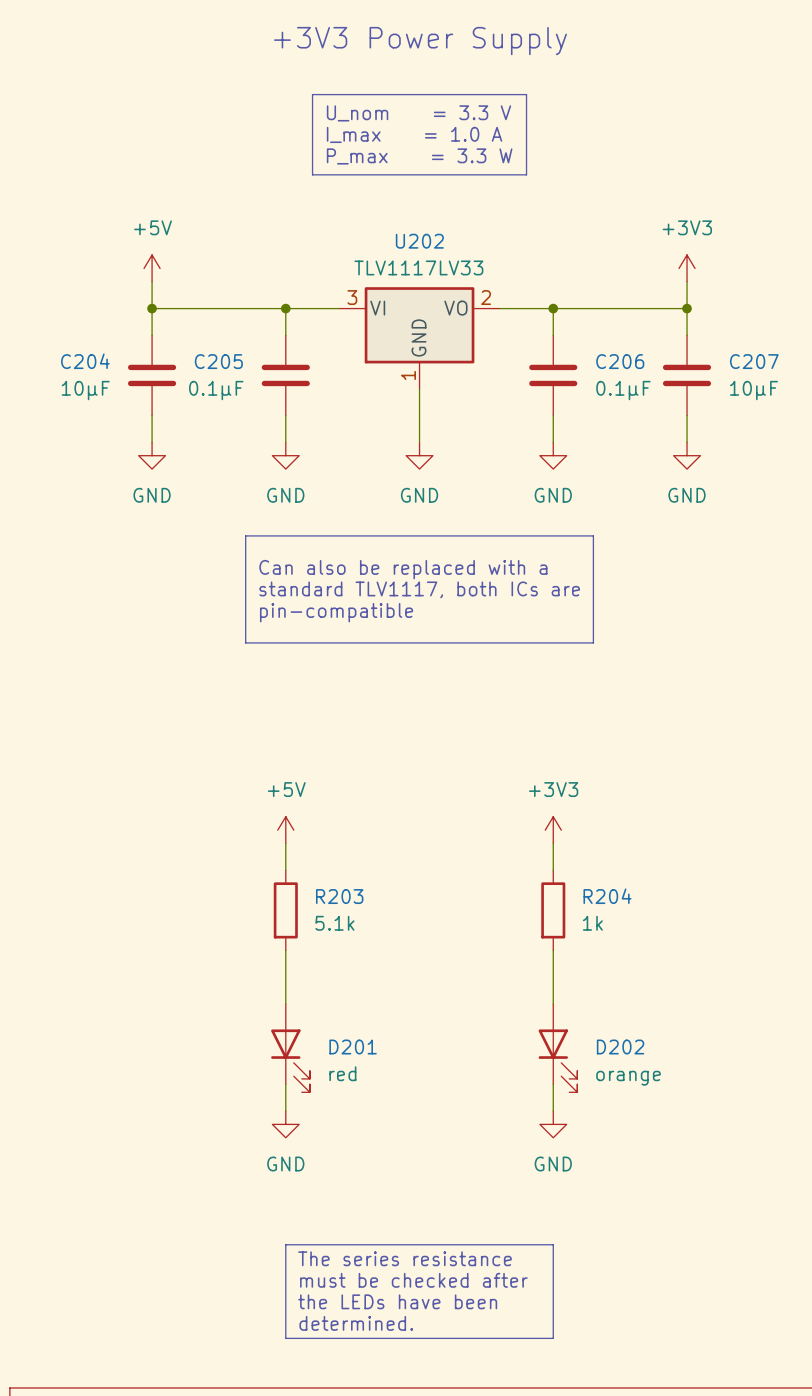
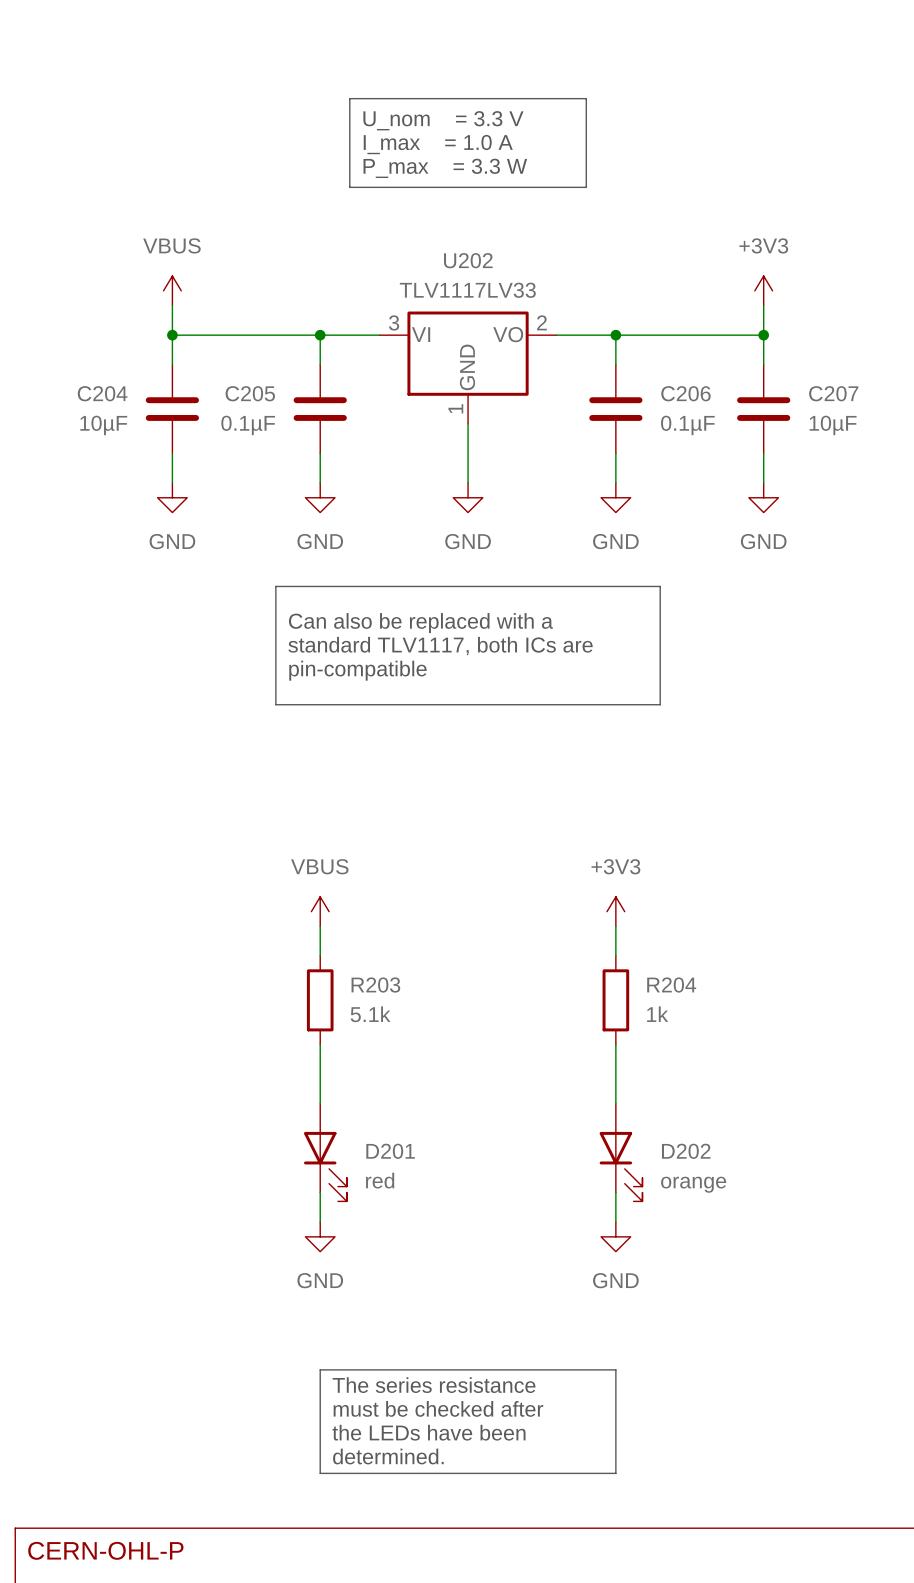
text: +3V3 Power Supply (420, 41) -> none
power symbol: +5V (152, 268) -> VBUS (172, 290)
power symbol: +5V (285, 830) -> VBUS (320, 911)

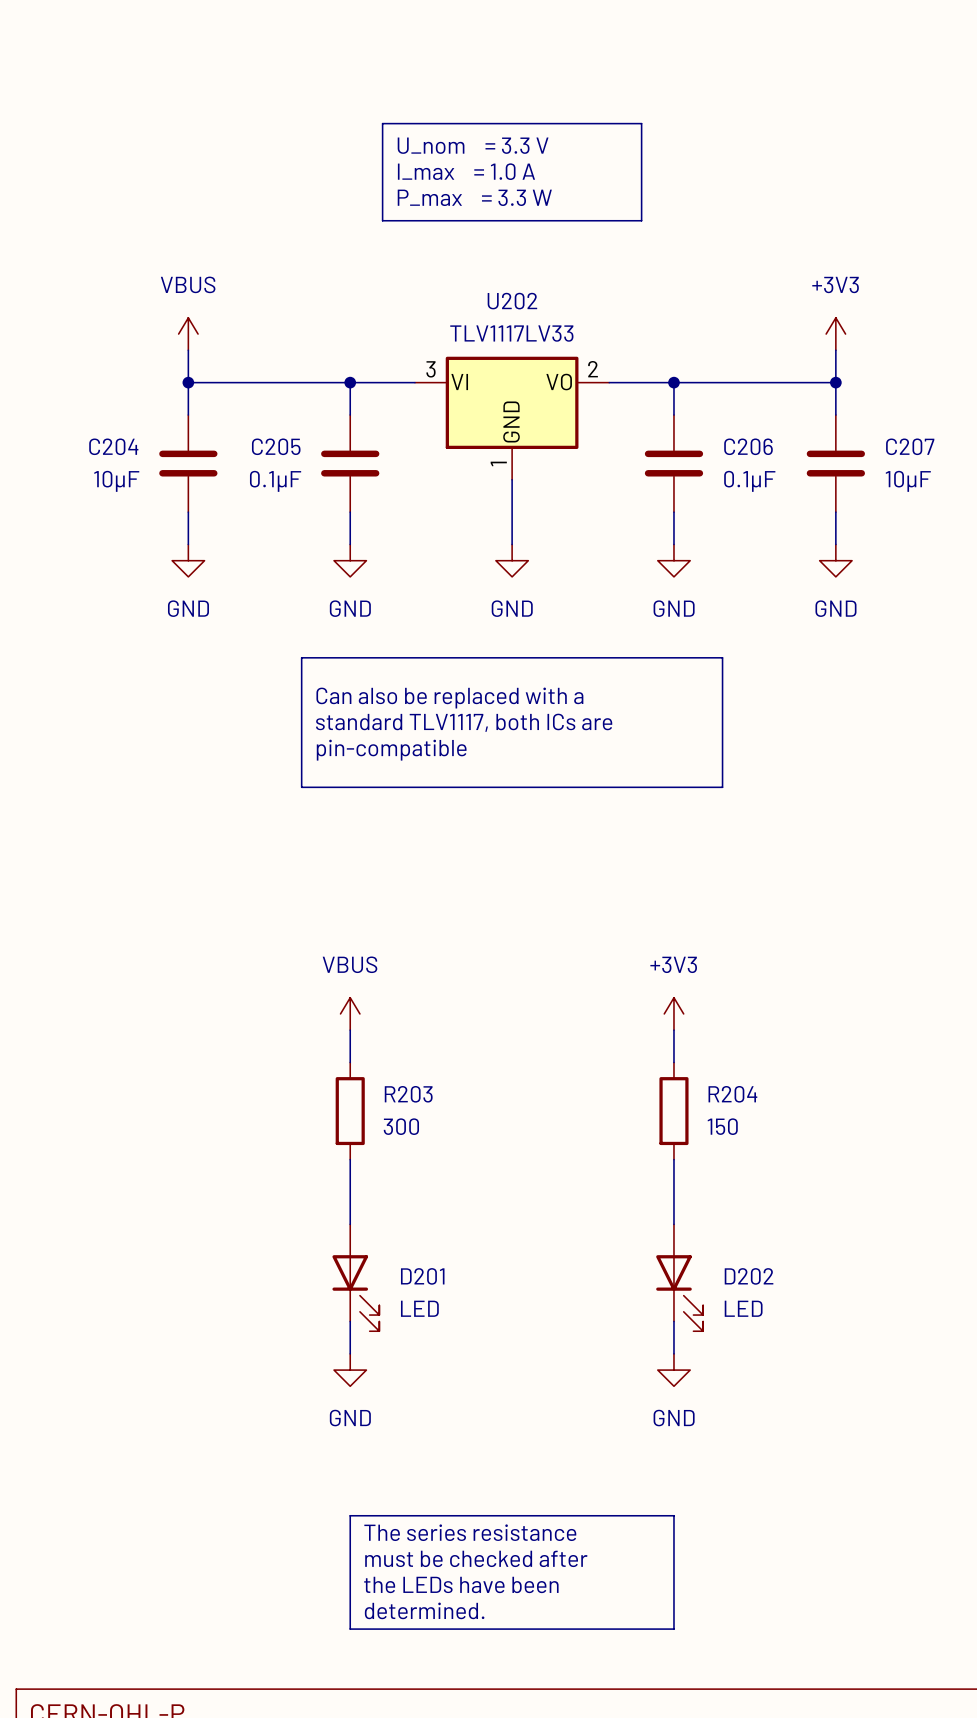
R203 value: 5.1k (370, 1014) -> 300 (401, 1126)
R204 value: 1k (657, 1014) -> 150 (722, 1126)
D201 value: red (380, 1180) -> LED (419, 1308)
D202 value: orange (693, 1184) -> LED (743, 1308)

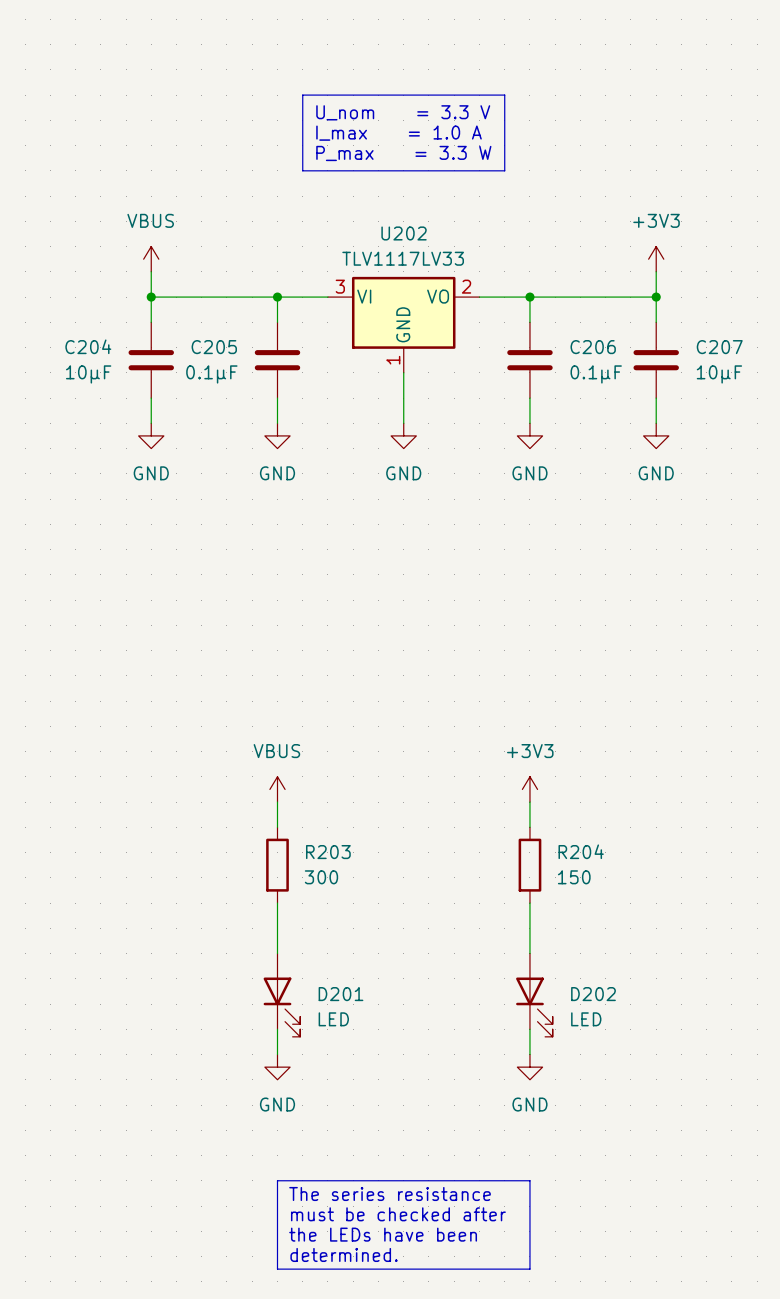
line: (301, 657) (722, 657) (722, 787) (301, 787) (301, 657) -> none
text: Can also be replaced with a (449, 698) -> none
text: standard TLV1117, both ICs are (464, 722) -> none
text: pin-compatible (391, 750) -> none

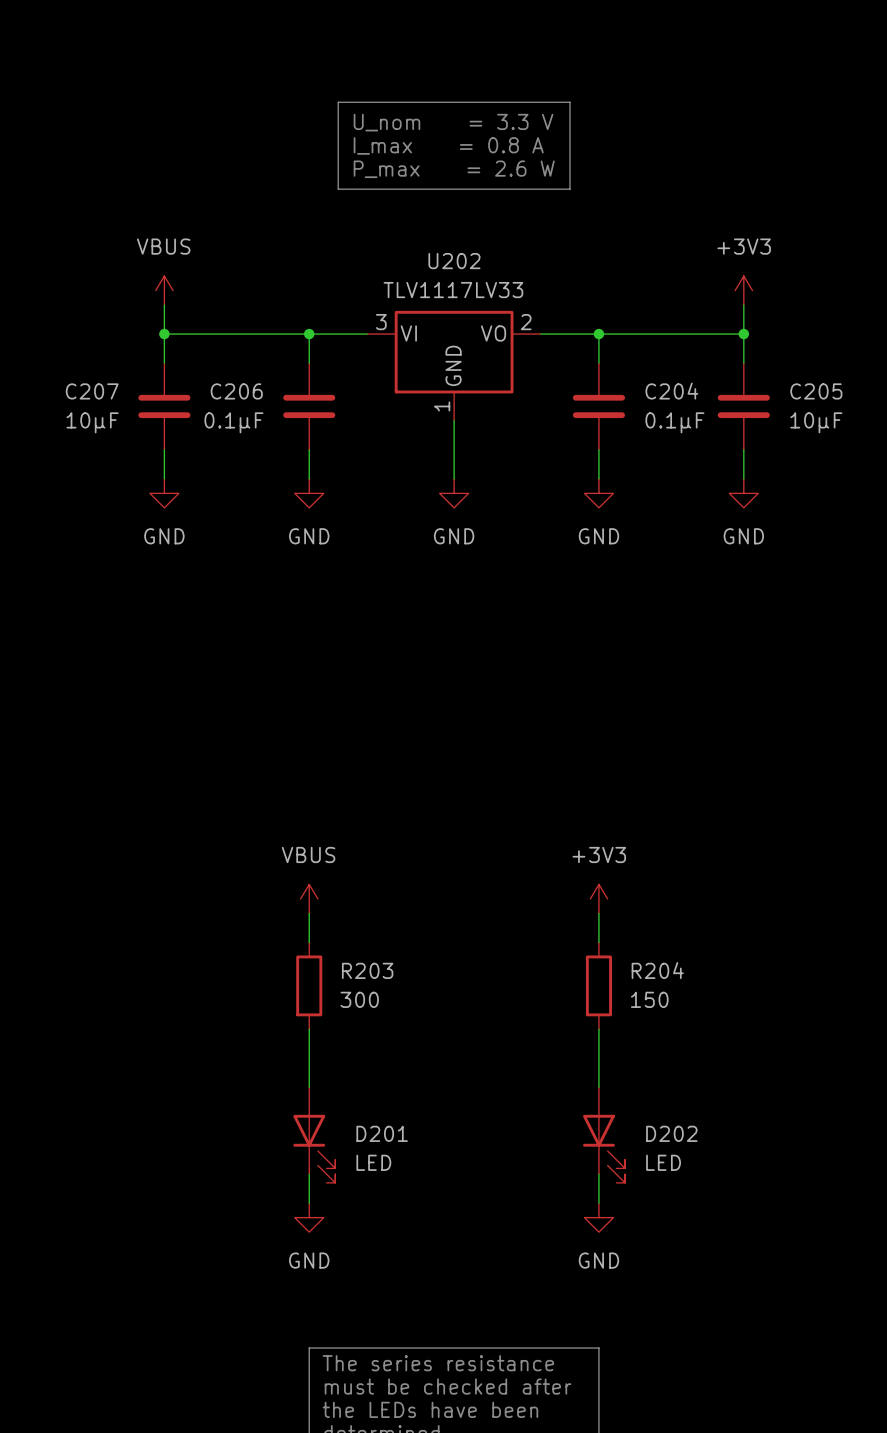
text: I_max = 1.0 A (399, 133) -> I_max = 0.8 A (448, 145)
text: P_max = 3.3 W (403, 153) -> P_max = 2.6 W (454, 169)
C204 name: C204 (88, 346) -> C207 (92, 391)
C205 name: C205 (214, 347) -> C206 (236, 391)
C206 name: C206 (593, 347) -> C204 (671, 391)
C207 name: C207 (719, 347) -> C205 (816, 391)

